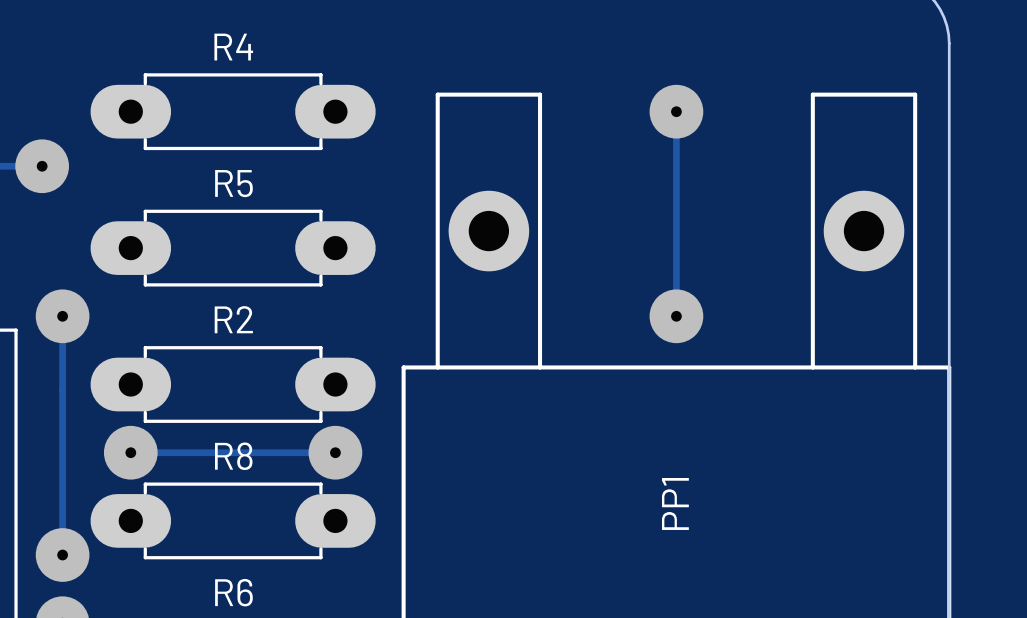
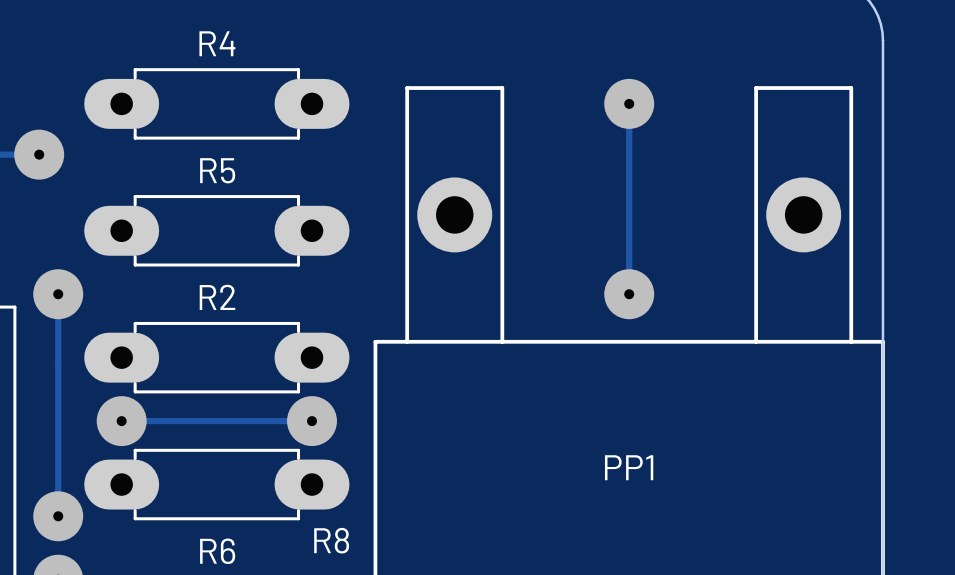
R8 name position: R8 (233, 456) -> R8 (331, 540)
PP1 name rotation: 0° (675, 503) -> 90° clockwise (629, 467)

